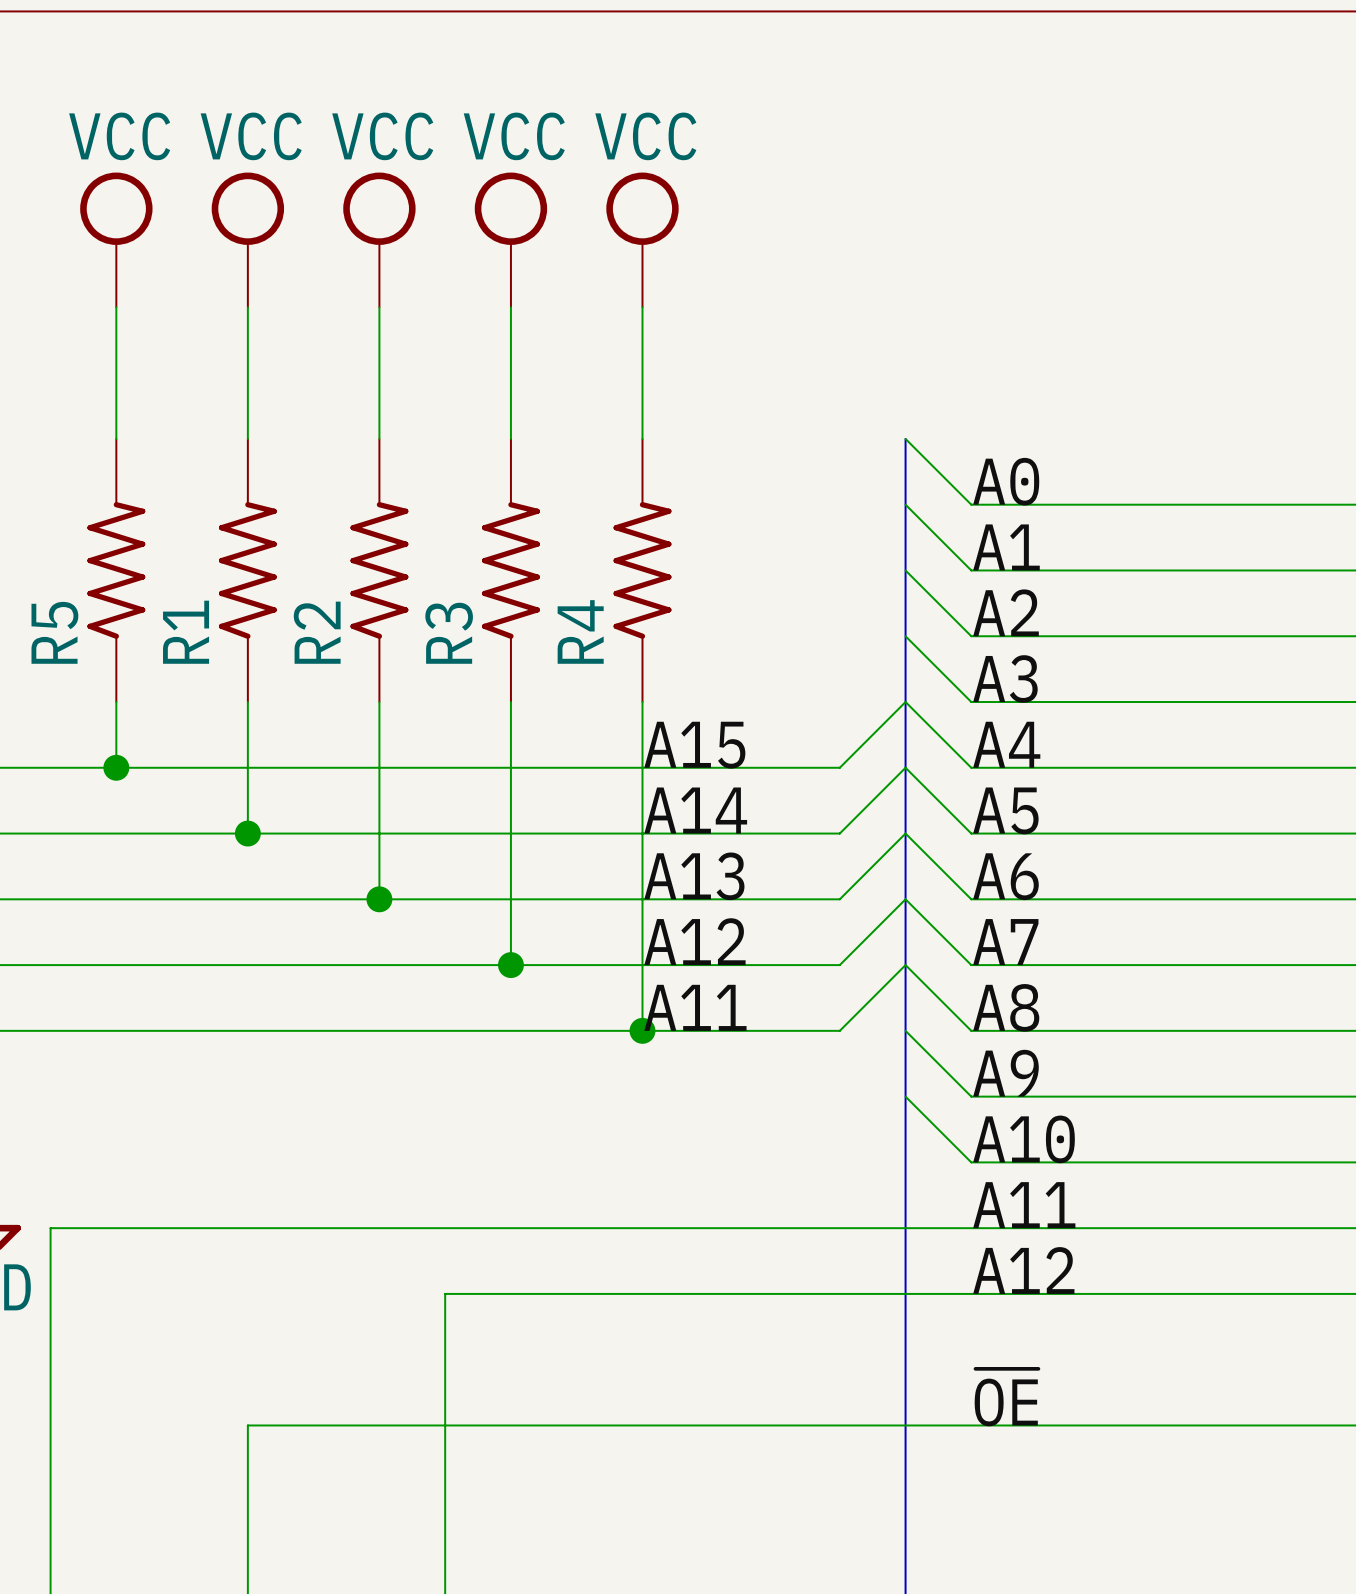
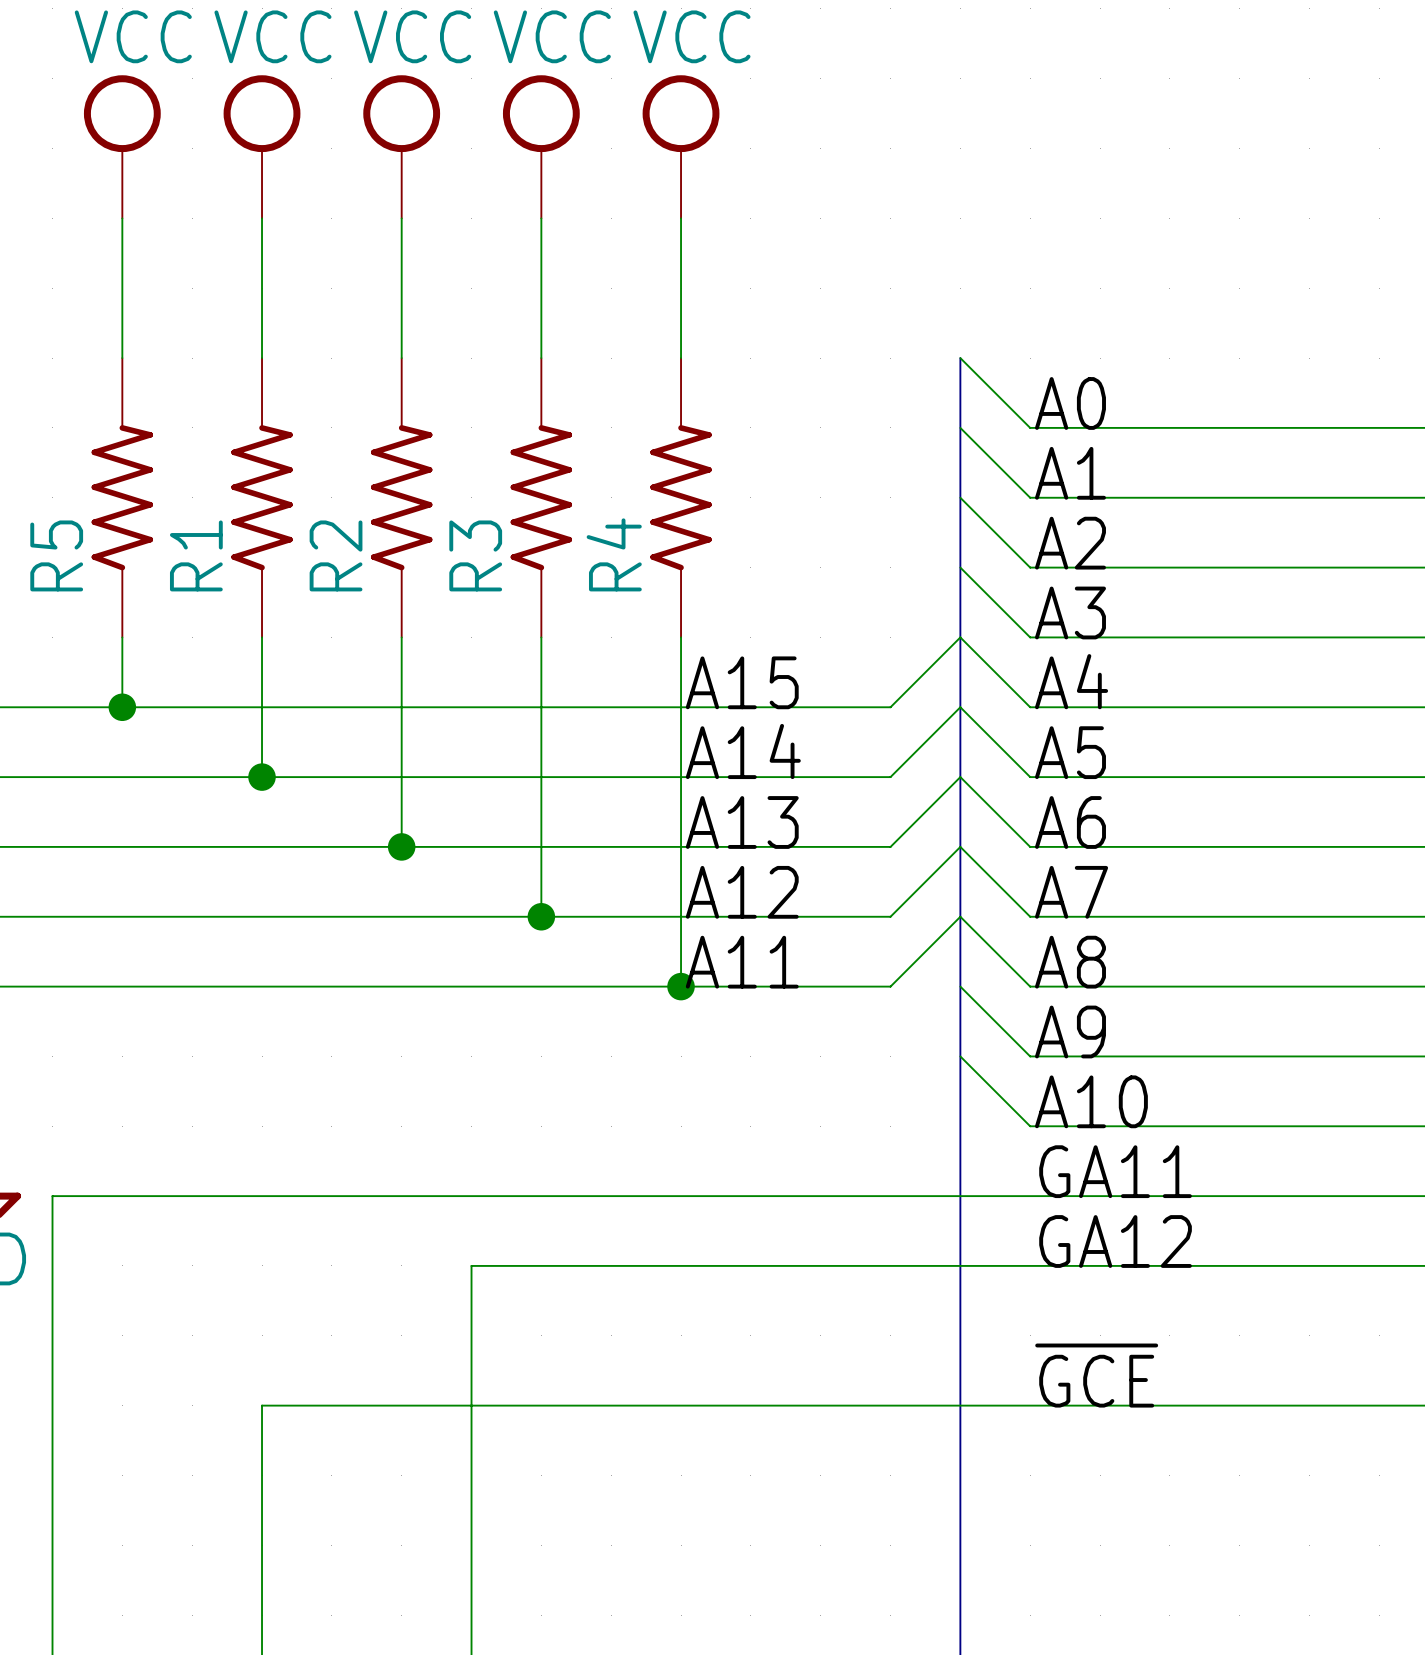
label: A11 (1024, 1205) -> GA11 (1115, 1171)
label: A12 (1023, 1270) -> GA12 (1115, 1241)
label: ~{OE} (1006, 1397) -> ~{GCE} (1096, 1375)

